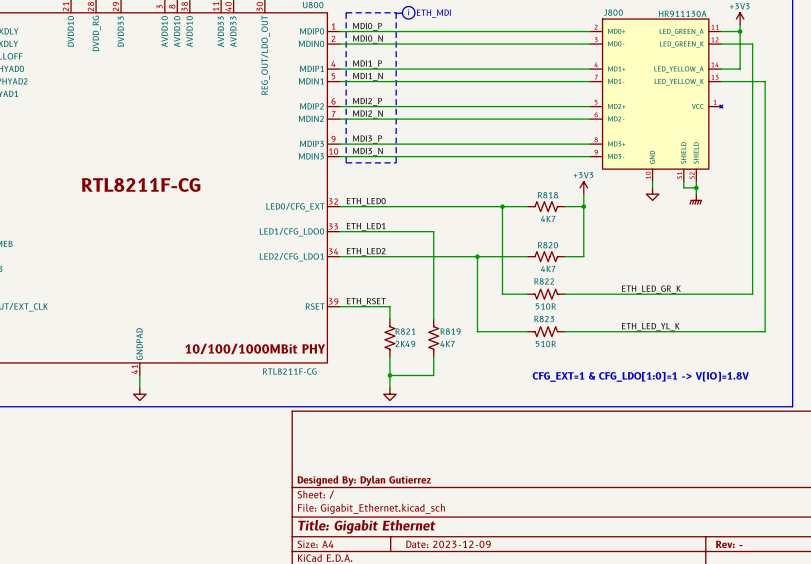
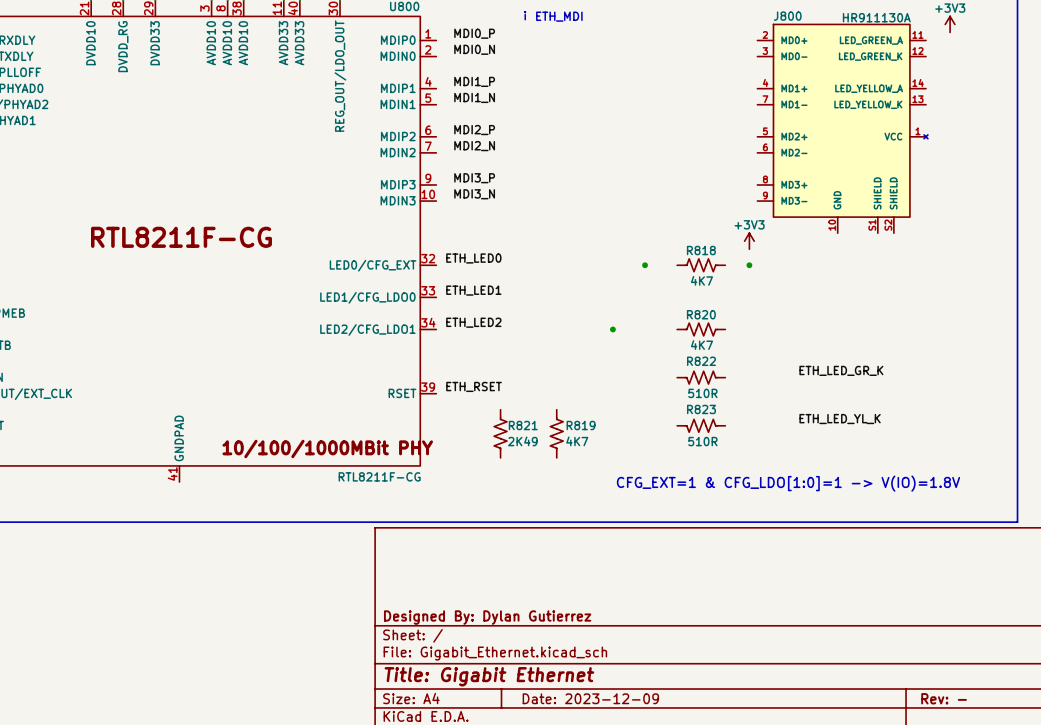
drawing: [402, 6, 415, 20] -> none
line: (346, 12) (396, 12) (396, 162) (346, 162) (346, 12) -> none
line: (396, 13) (402, 13) -> none
wire: (740, 25) (740, 69) (721, 69) -> none
wire: (339, 31) (590, 31) -> none
wire: (721, 31) (740, 31) -> none
junction: (740, 31) -> none
wire: (339, 44) (590, 44) -> none
wire: (721, 44) (752, 44) (752, 294) (565, 294) -> none
wire: (339, 69) (590, 69) -> none
wire: (339, 81) (590, 81) -> none
wire: (721, 81) (765, 81) (765, 331) (565, 331) -> none
wire: (339, 106) (590, 106) -> none
wire: (339, 119) (590, 119) -> none
wire: (339, 144) (590, 144) -> none
wire: (339, 156) (590, 156) -> none
wire: (652, 181) (652, 187) -> none
wire: (683, 181) (683, 187) (696, 187) -> none
wire: (696, 181) (696, 194) -> none
junction: (696, 187) -> none
wire: (583, 194) (583, 256) (565, 256) -> none
power symbol: (652, 194) -> none
power symbol: (695, 199) -> none
wire: (339, 206) (527, 206) -> none
wire: (502, 206) (502, 294) (527, 294) -> none
wire: (565, 206) (583, 206) -> none
wire: (339, 231) (433, 231) (433, 319) -> none
wire: (339, 256) (527, 256) -> none
wire: (477, 256) (477, 331) (527, 331) -> none
wire: (339, 306) (389, 306) (389, 319) -> none
wire: (389, 356) (389, 387) -> none
wire: (433, 356) (433, 375) (389, 375) -> none
wire: (139, 375) (139, 387) -> none
junction: (389, 375) -> none
power symbol: (139, 394) -> none
power symbol: (389, 394) -> none

